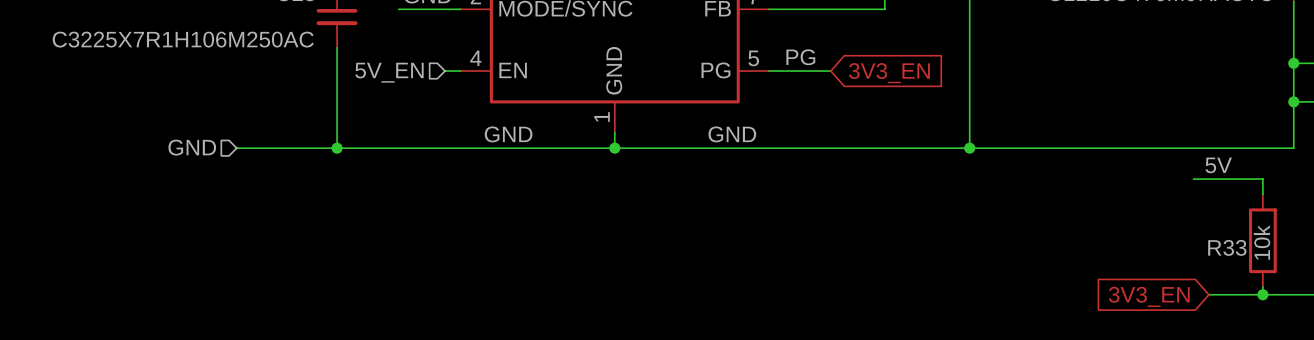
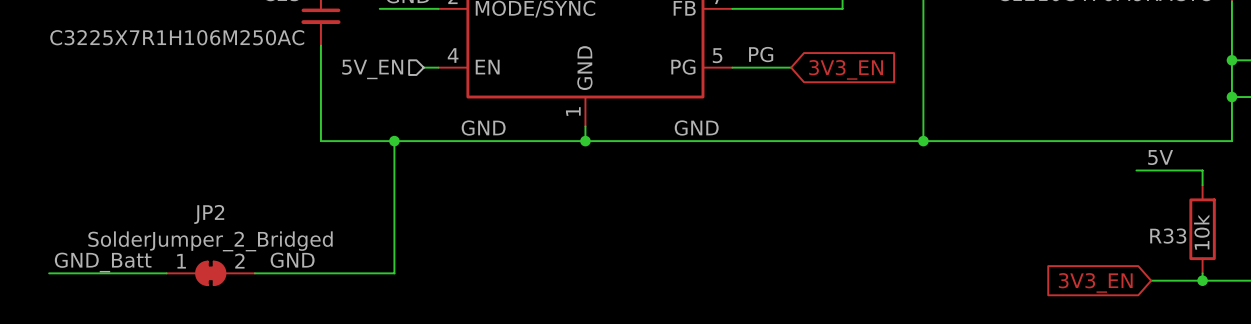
hierarchical label: GND (192, 147) -> none
wire: (236, 148) (337, 148) -> none
junction: (337, 148) -> none
wire: none -> (394, 141) (394, 273) (254, 273)
junction: none -> (394, 141)
label: none -> GND (292, 260)
label: none -> GND_Batt (103, 262)
wire: none -> (49, 273) (166, 273)
JP2: none -> SolderJumper_2_Bridged (210, 273)

